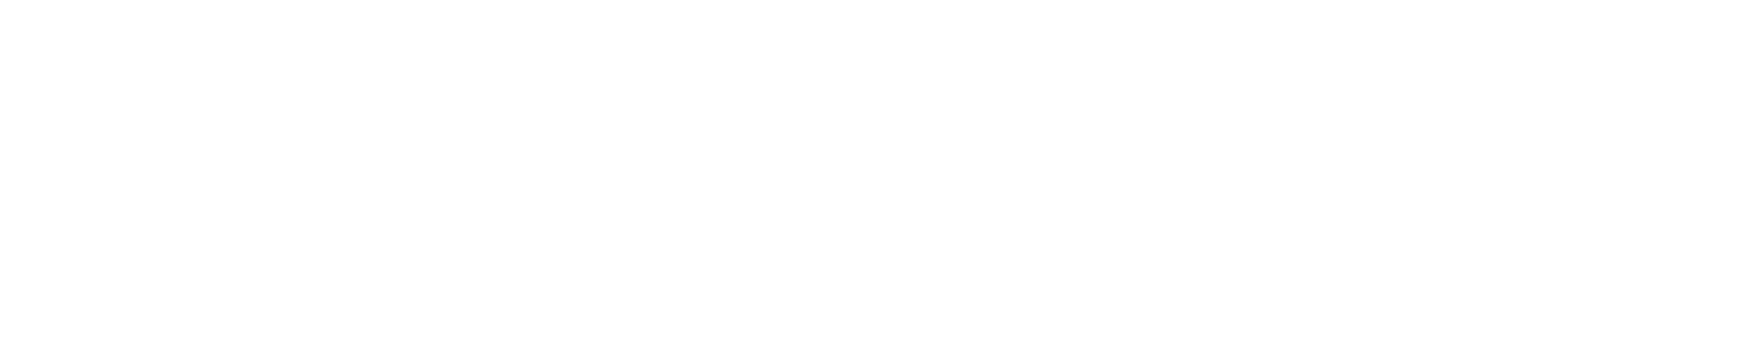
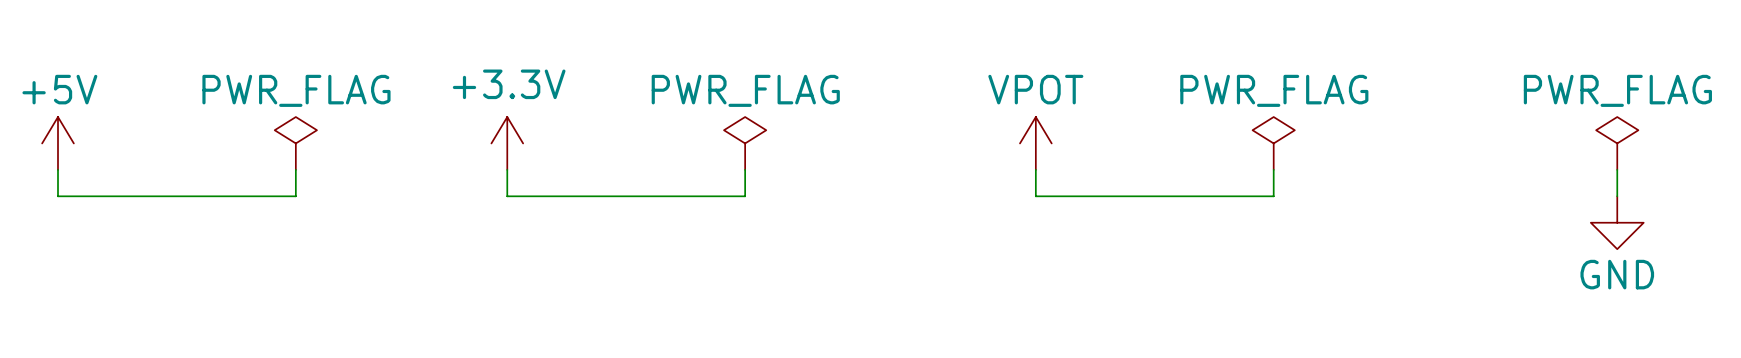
power symbol: none -> +5V (57, 143)
power symbol: none -> PWR_FLAG (295, 143)
power symbol: none -> +3.3V (507, 143)
power symbol: none -> PWR_FLAG (745, 143)
power symbol: none -> VPOT (1035, 143)
power symbol: none -> PWR_FLAG (1273, 143)
power symbol: none -> PWR_FLAG (1617, 143)
wire: none -> (57, 169) (57, 196) (295, 196) (295, 169)
wire: none -> (507, 169) (507, 196) (745, 196) (745, 169)
wire: none -> (1035, 169) (1035, 196) (1273, 196) (1273, 169)
wire: none -> (1617, 169) (1617, 196)
power symbol: none -> GND (1617, 222)

